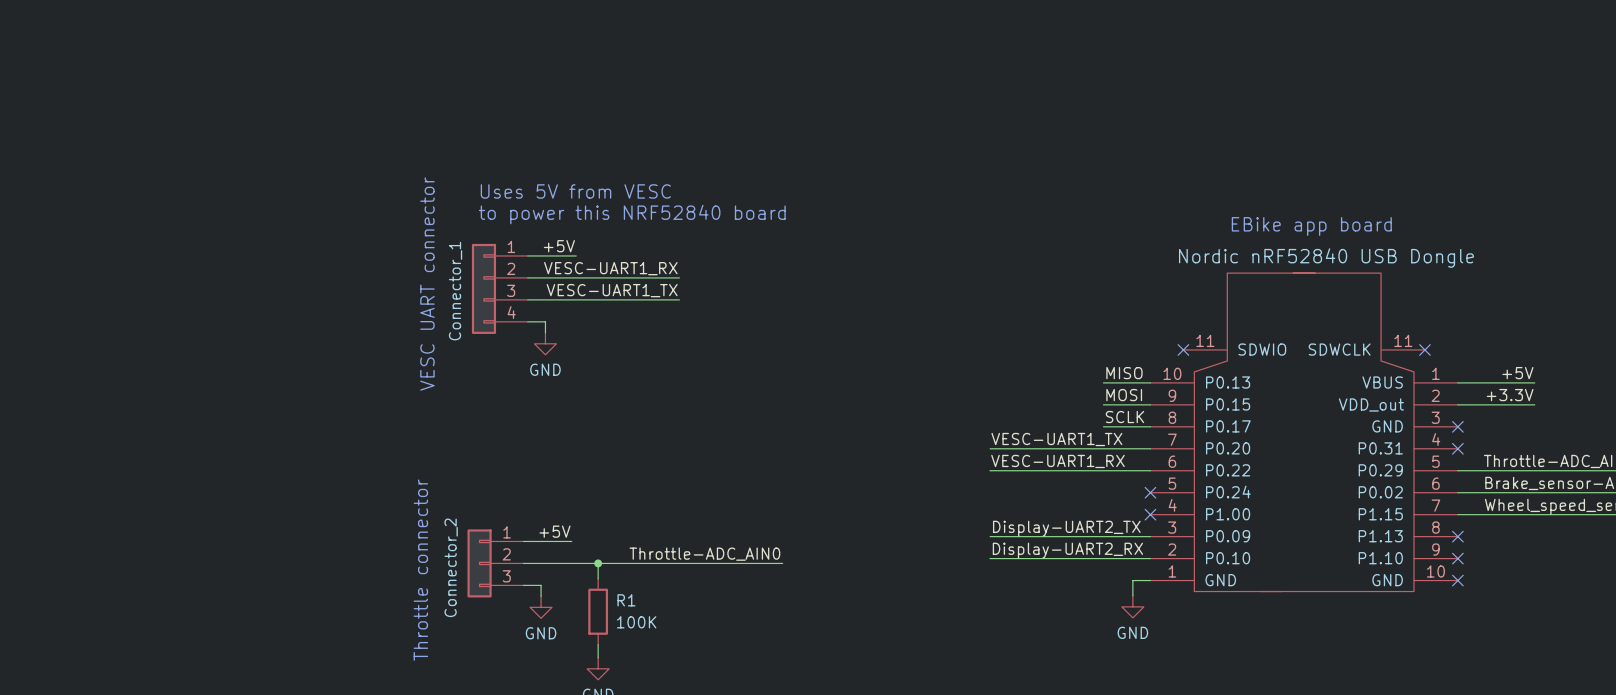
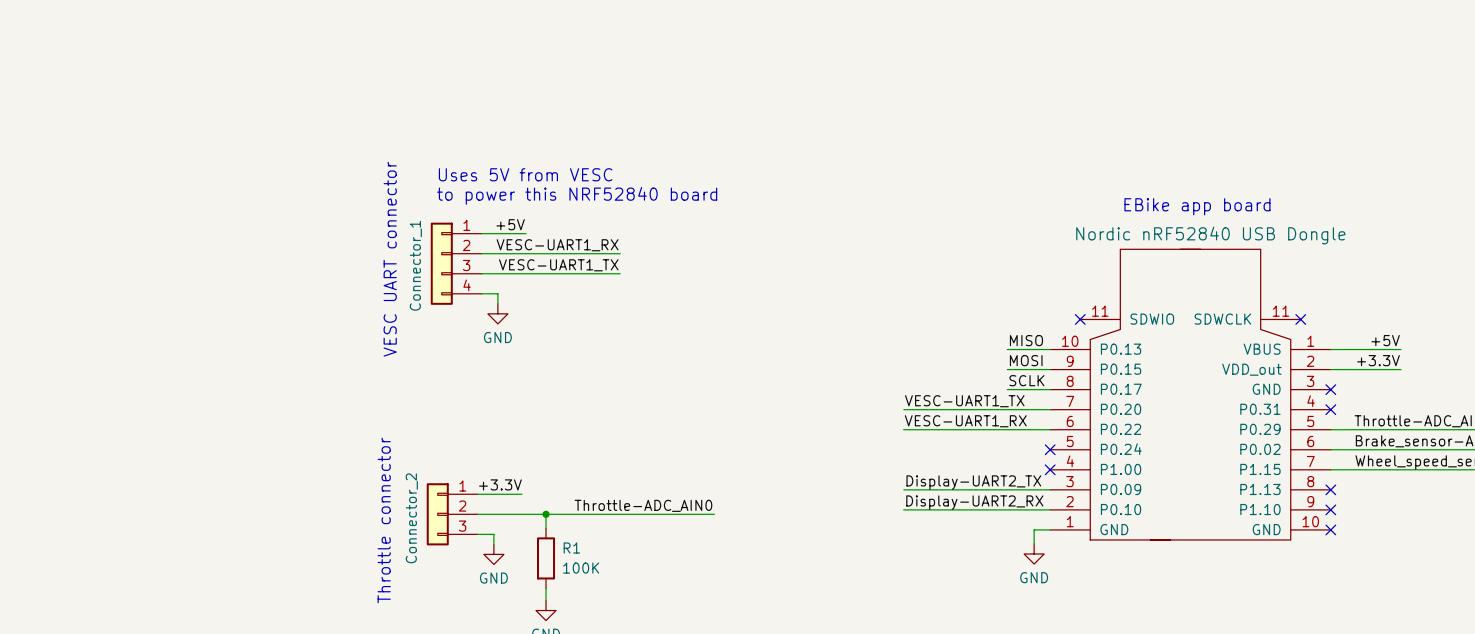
label: +5V (554, 531) -> +3.3V (500, 484)

